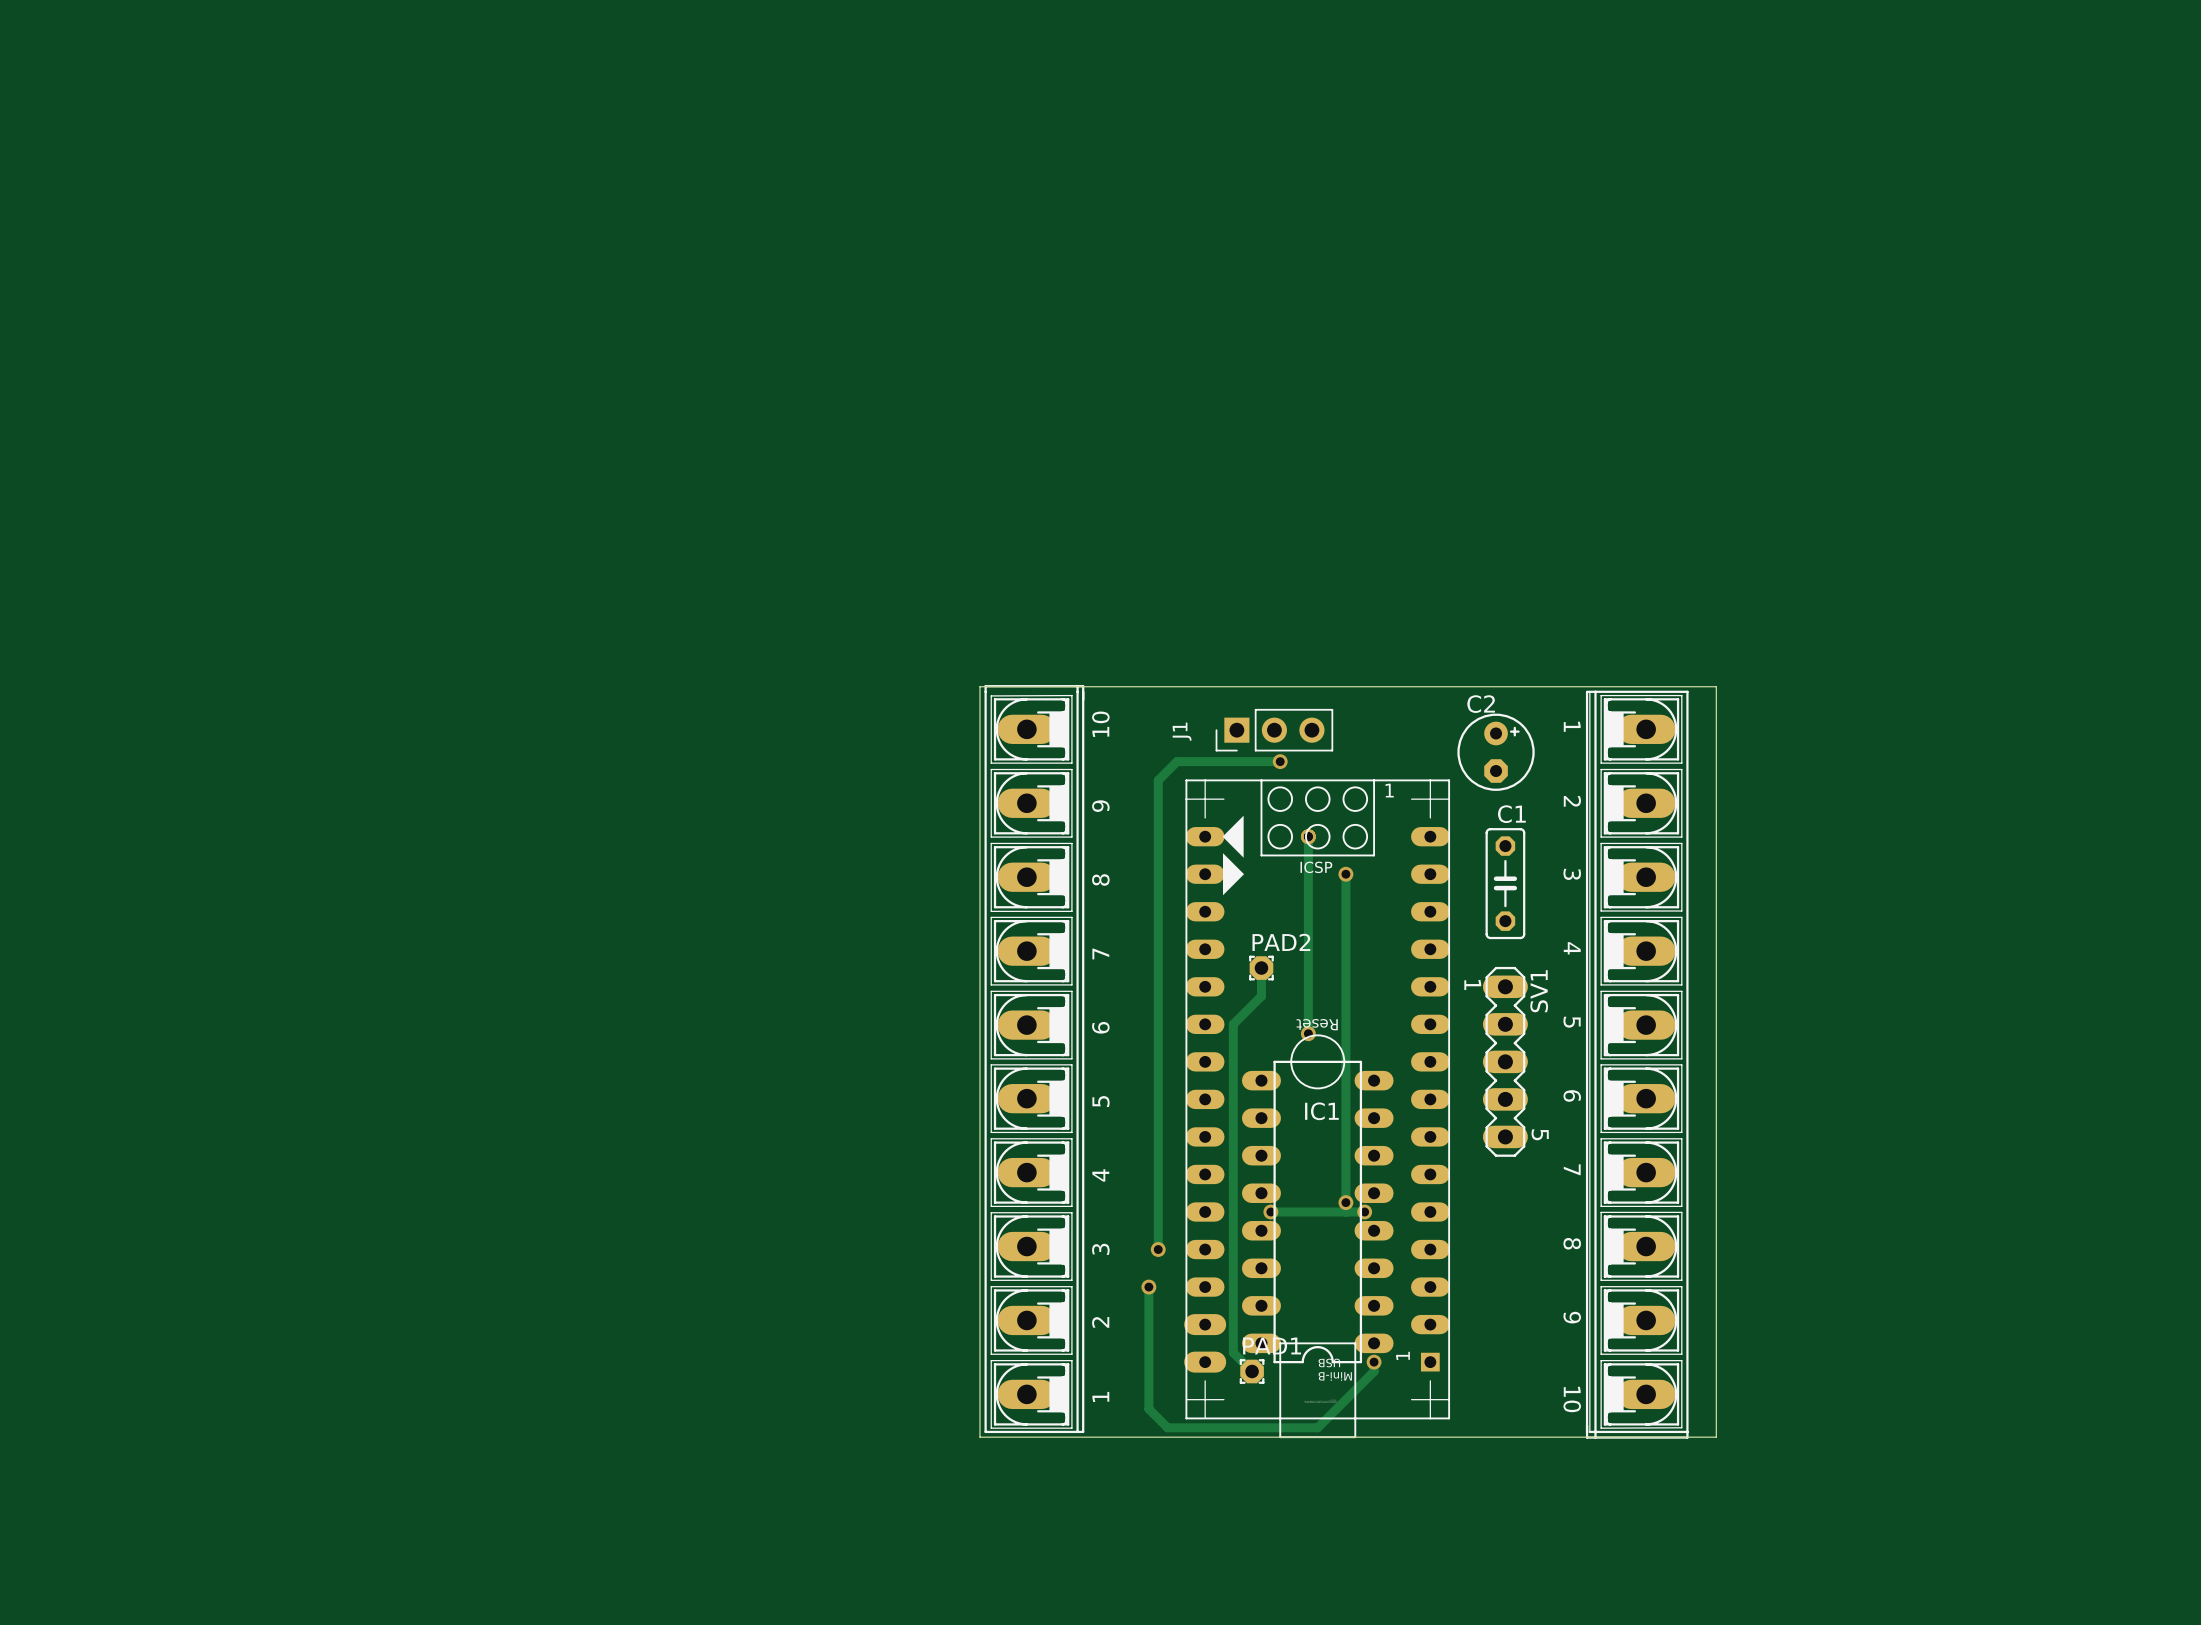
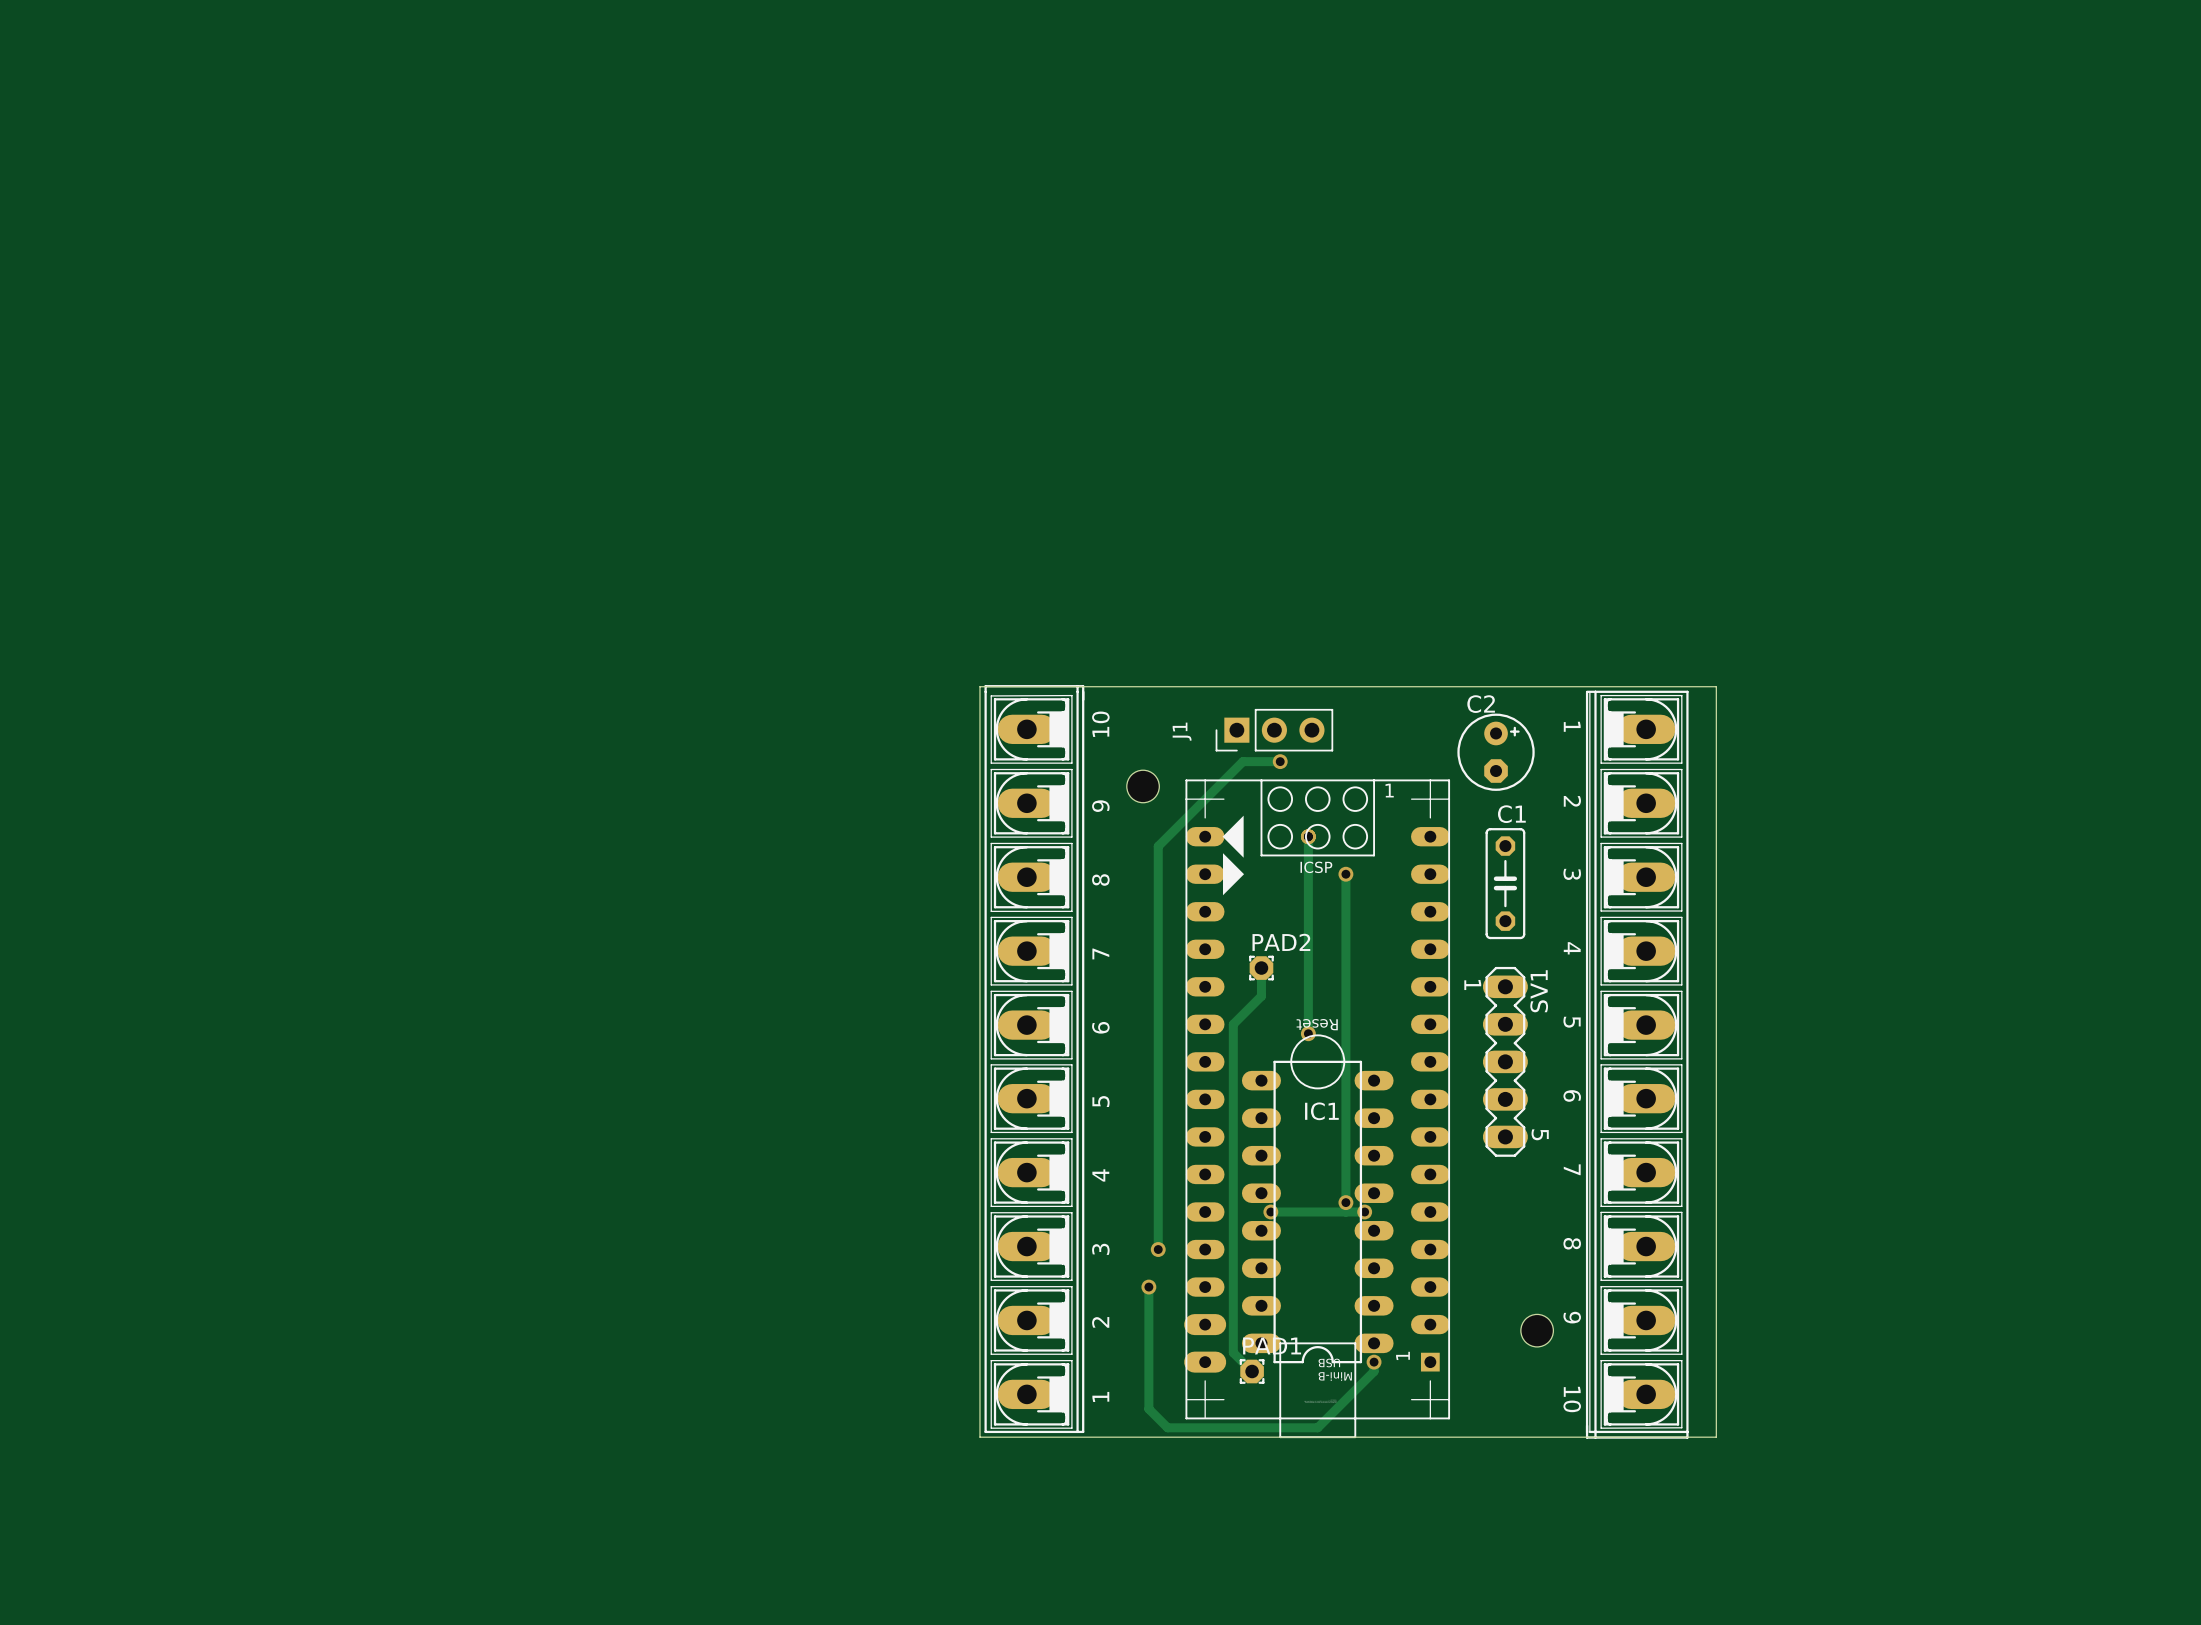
track: (1242, 761) (1177, 761) (1158, 780) (1158, 846) -> (1242, 761) (1158, 846)
part: none -> (1143, 786)
part: none -> (1537, 1330)

